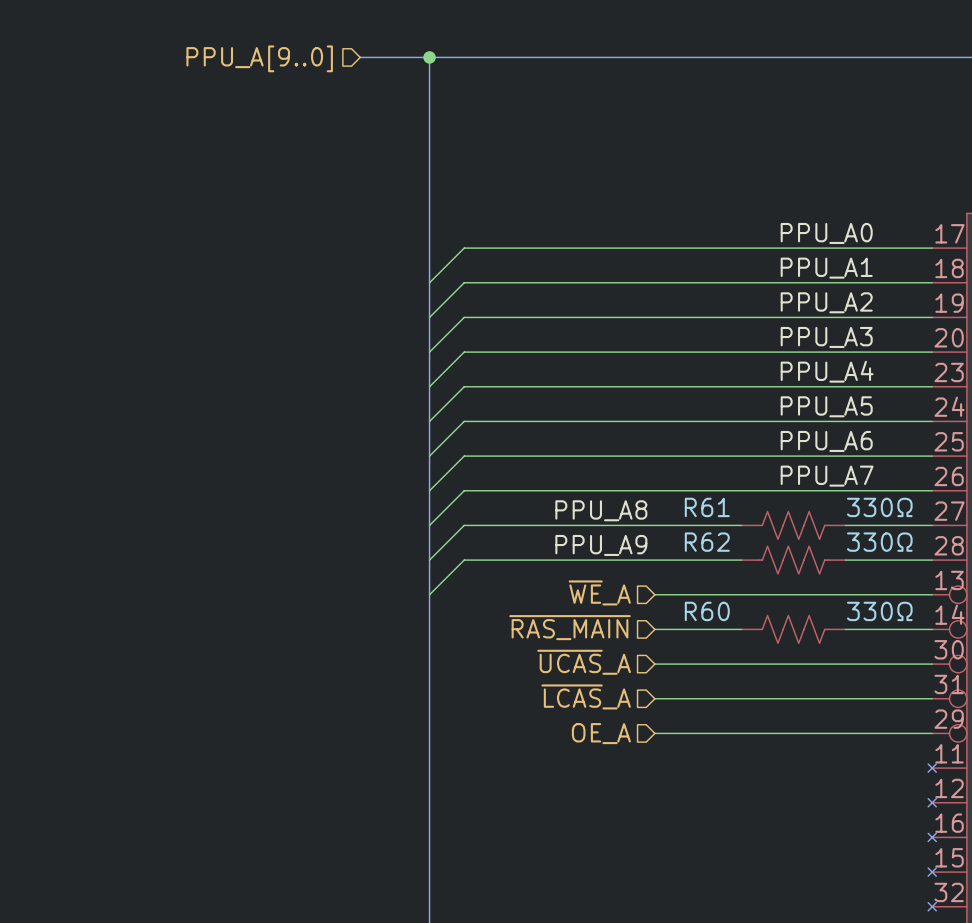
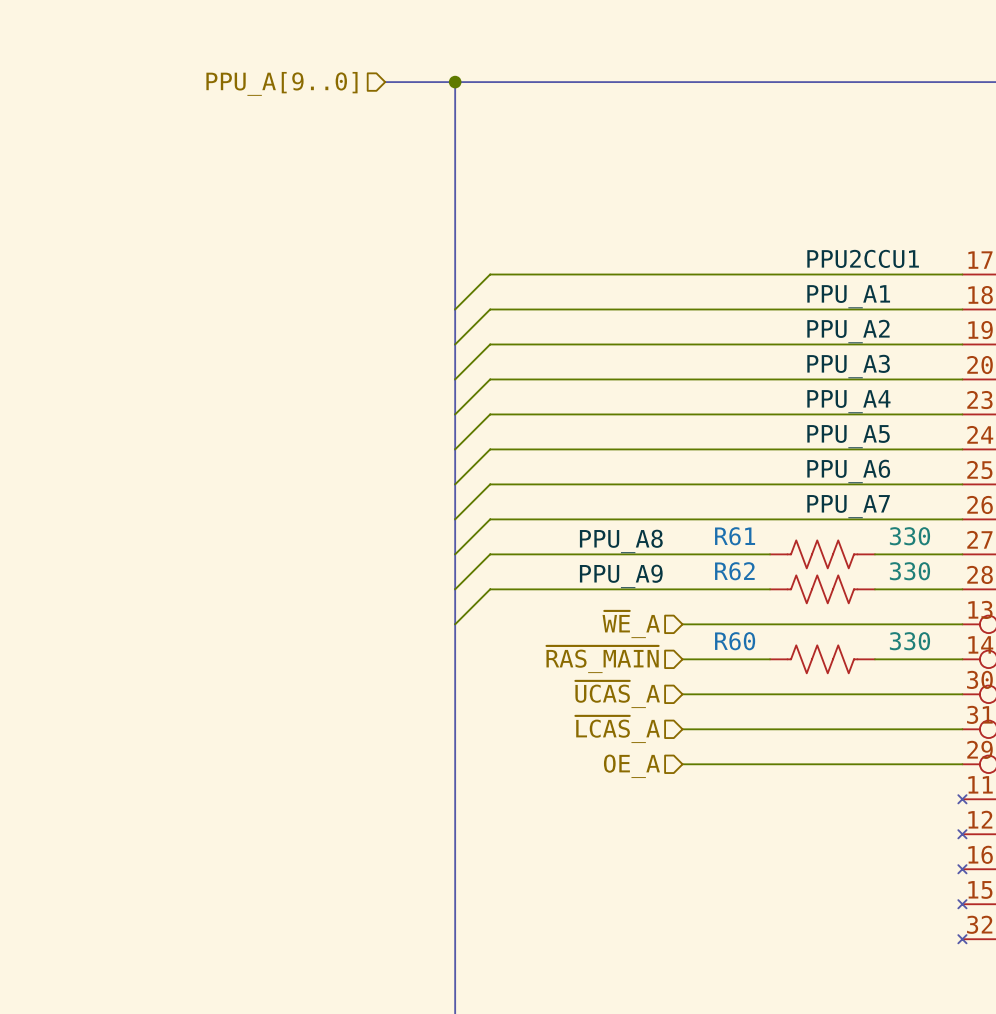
label: PPU_A0 (826, 233) -> PPU2CCU1 (863, 258)
R61 value: 330Ω (879, 507) -> 330 (909, 536)
R62 value: 330Ω (879, 542) -> 330 (909, 571)
R60 value: 330Ω (879, 611) -> 330 (909, 641)

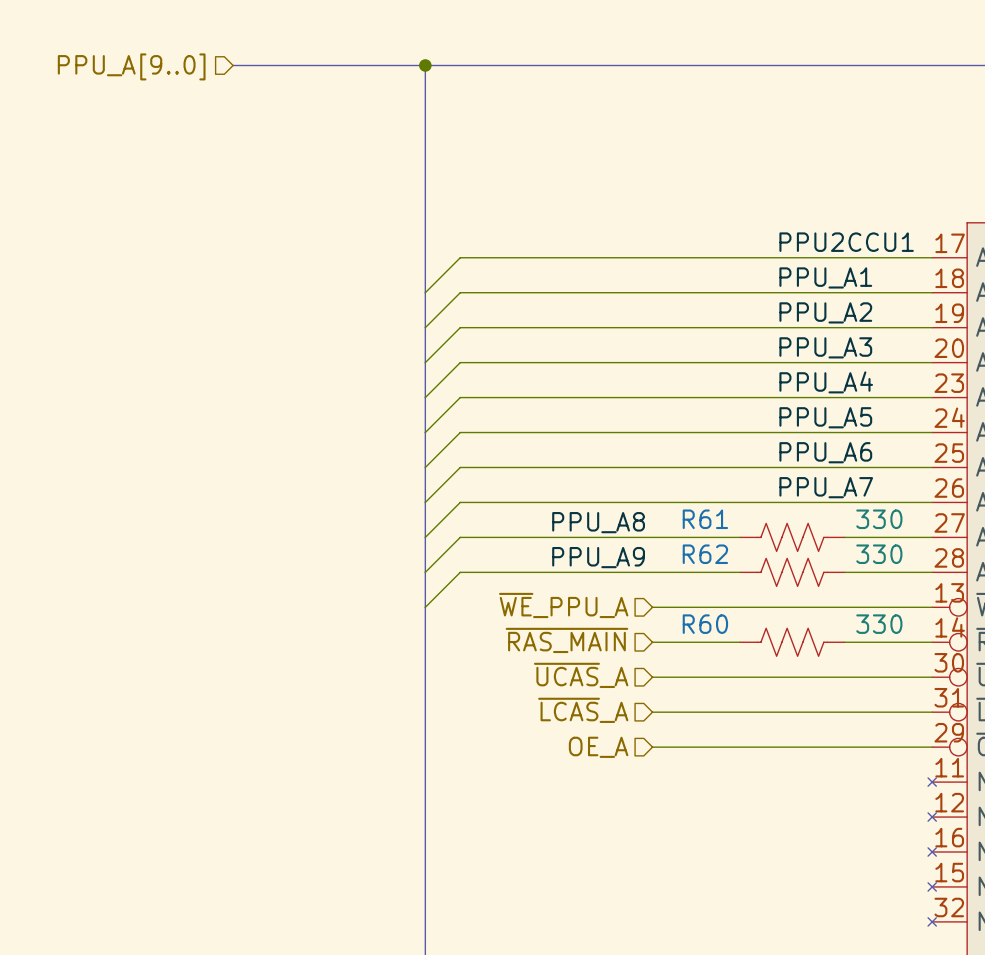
bus: none -> (233, 65) (355, 65)
hierarchical label position: PPU_A[9..0] (281, 83) -> PPU_A[9..0] (131, 66)
hierarchical label: ~{WE}_A (631, 624) -> ~{WE}_PPU_A (563, 605)

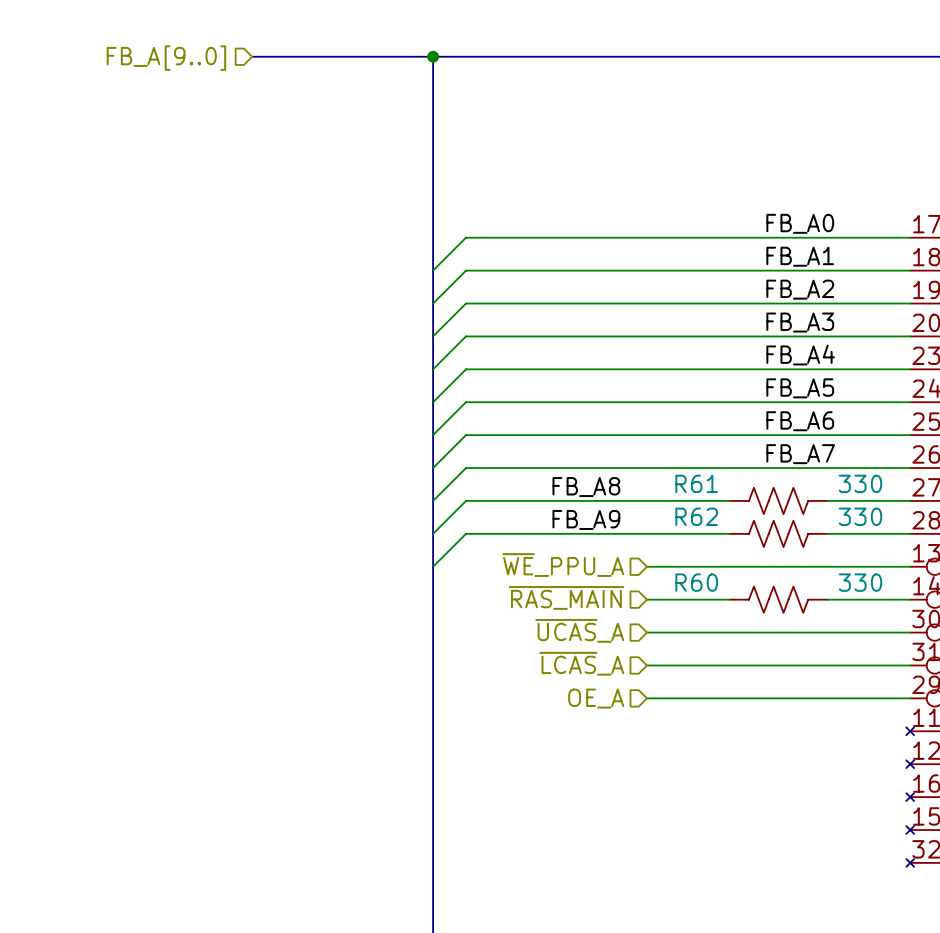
hierarchical label: PPU_A[9..0] (131, 66) -> FB_A[9..0] (166, 58)
label: PPU2CCU1 (846, 242) -> FB_A0 (800, 223)
label: PPU_A1 (825, 277) -> FB_A1 (800, 256)
label: PPU_A2 (825, 312) -> FB_A2 (800, 289)
label: PPU_A3 (825, 347) -> FB_A3 (800, 322)
label: PPU_A4 (826, 382) -> FB_A4 (800, 355)
label: PPU_A5 (825, 417) -> FB_A5 (800, 388)
label: PPU_A6 (825, 452) -> FB_A6 (800, 421)
label: PPU_A7 (826, 487) -> FB_A7 (800, 454)
label: PPU_A8 (598, 522) -> FB_A8 (586, 487)
label: PPU_A9 (598, 557) -> FB_A9 (586, 519)

